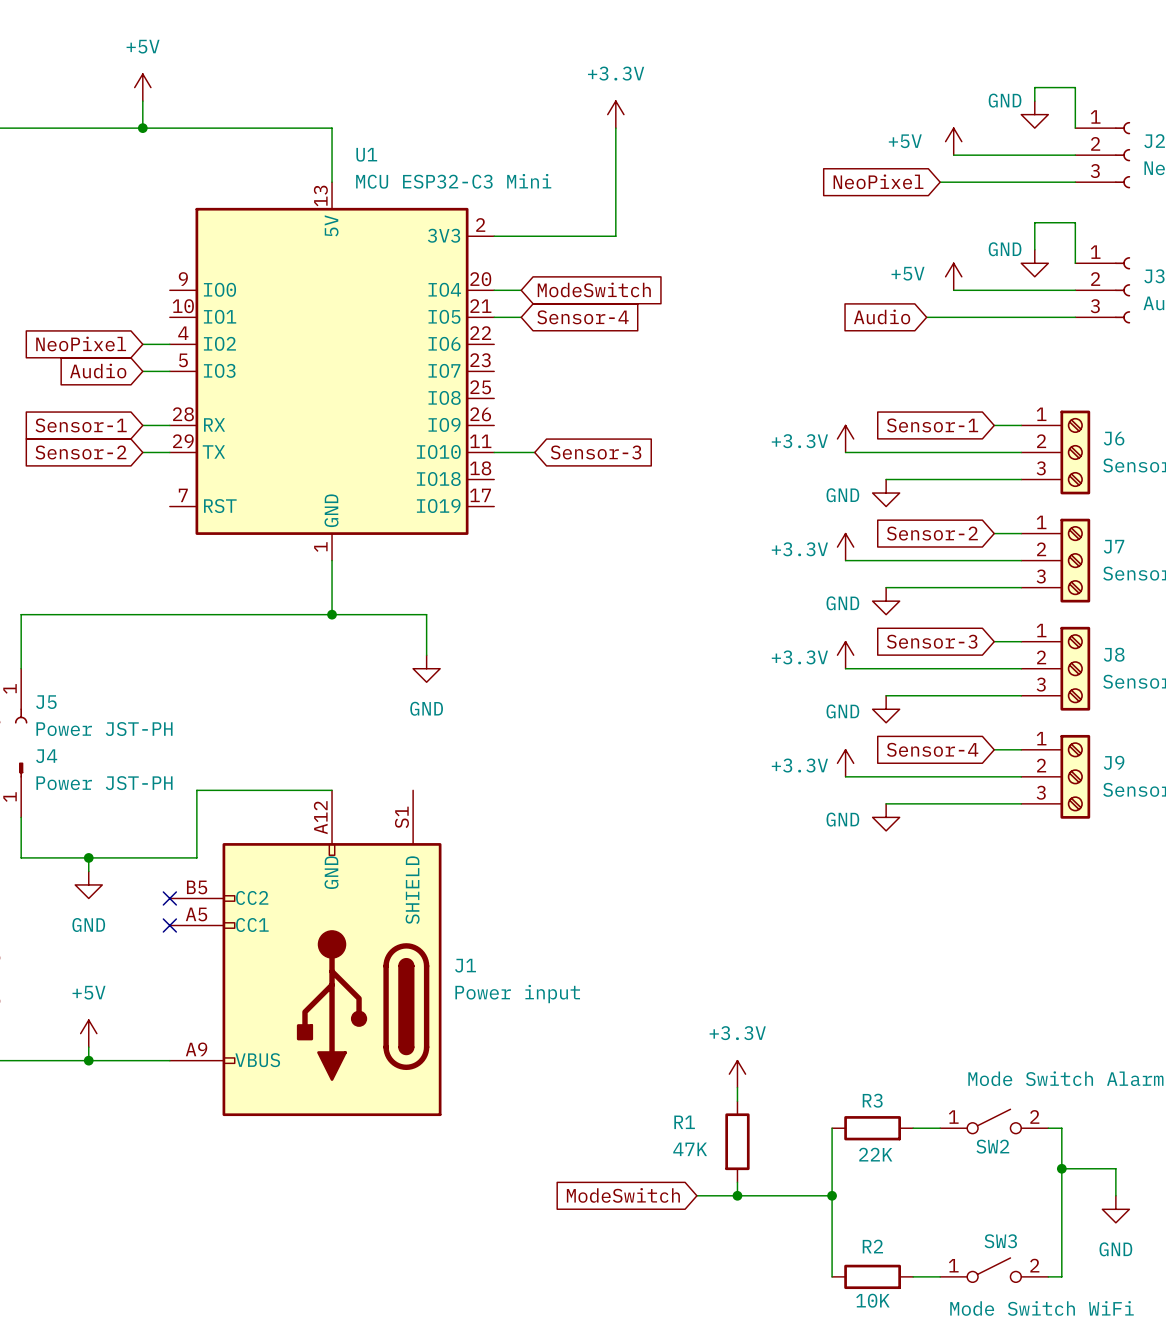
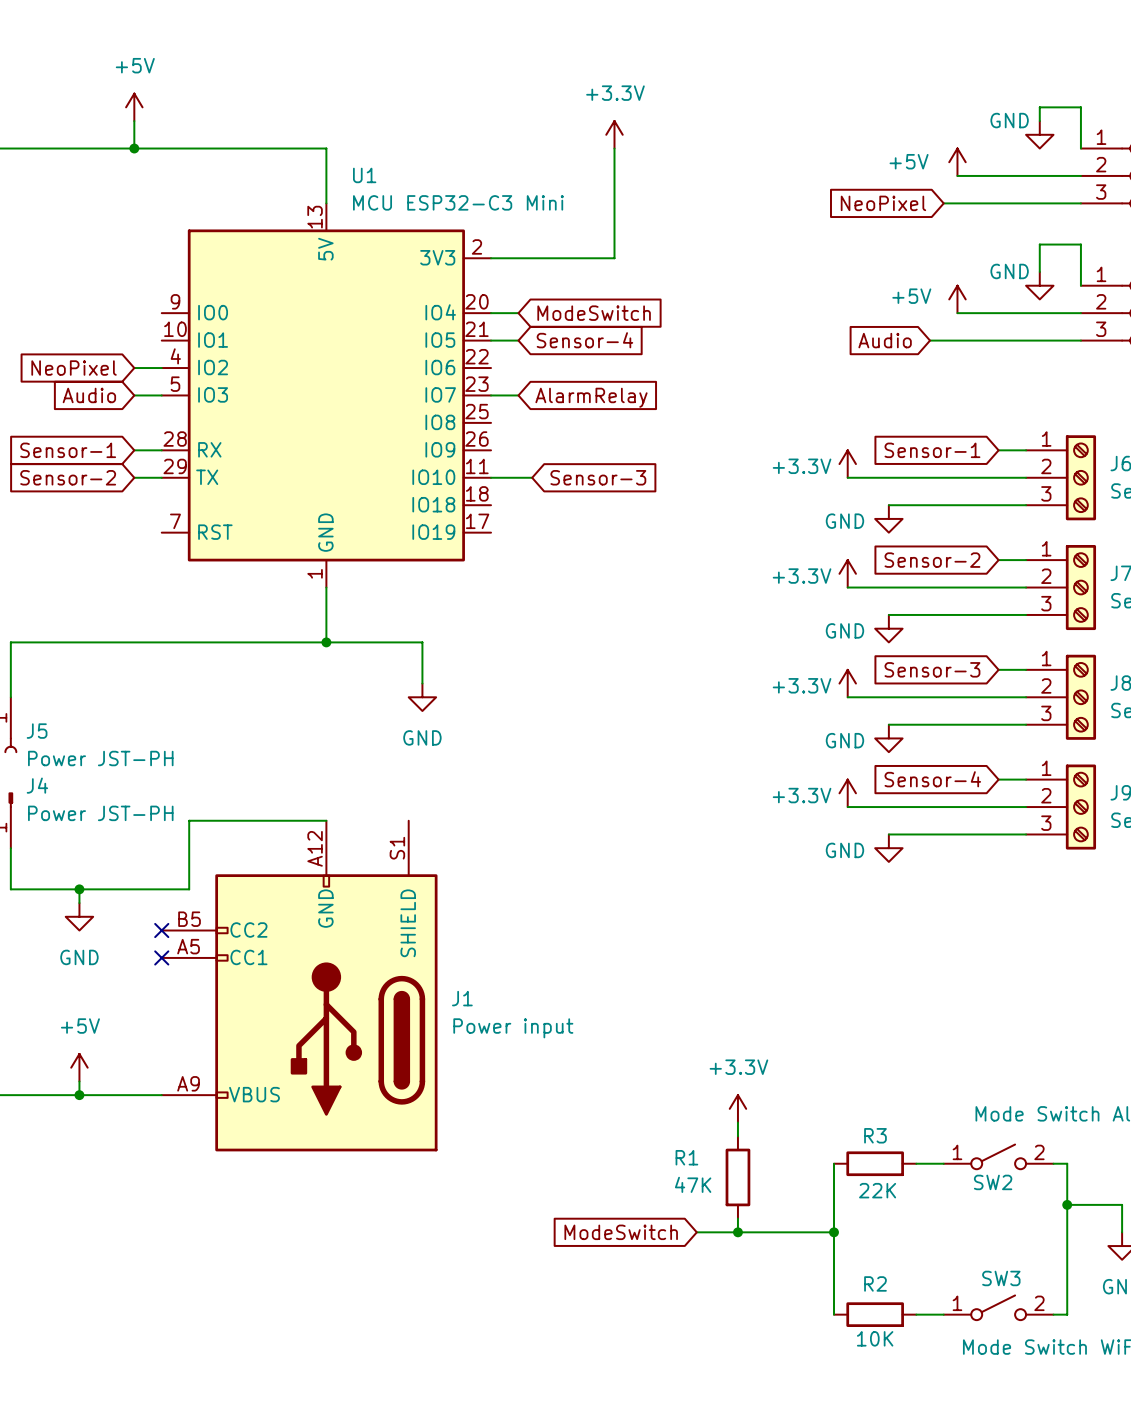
wire: none -> (491, 395) (518, 395)
global label: none -> AlarmRelay (591, 397)

